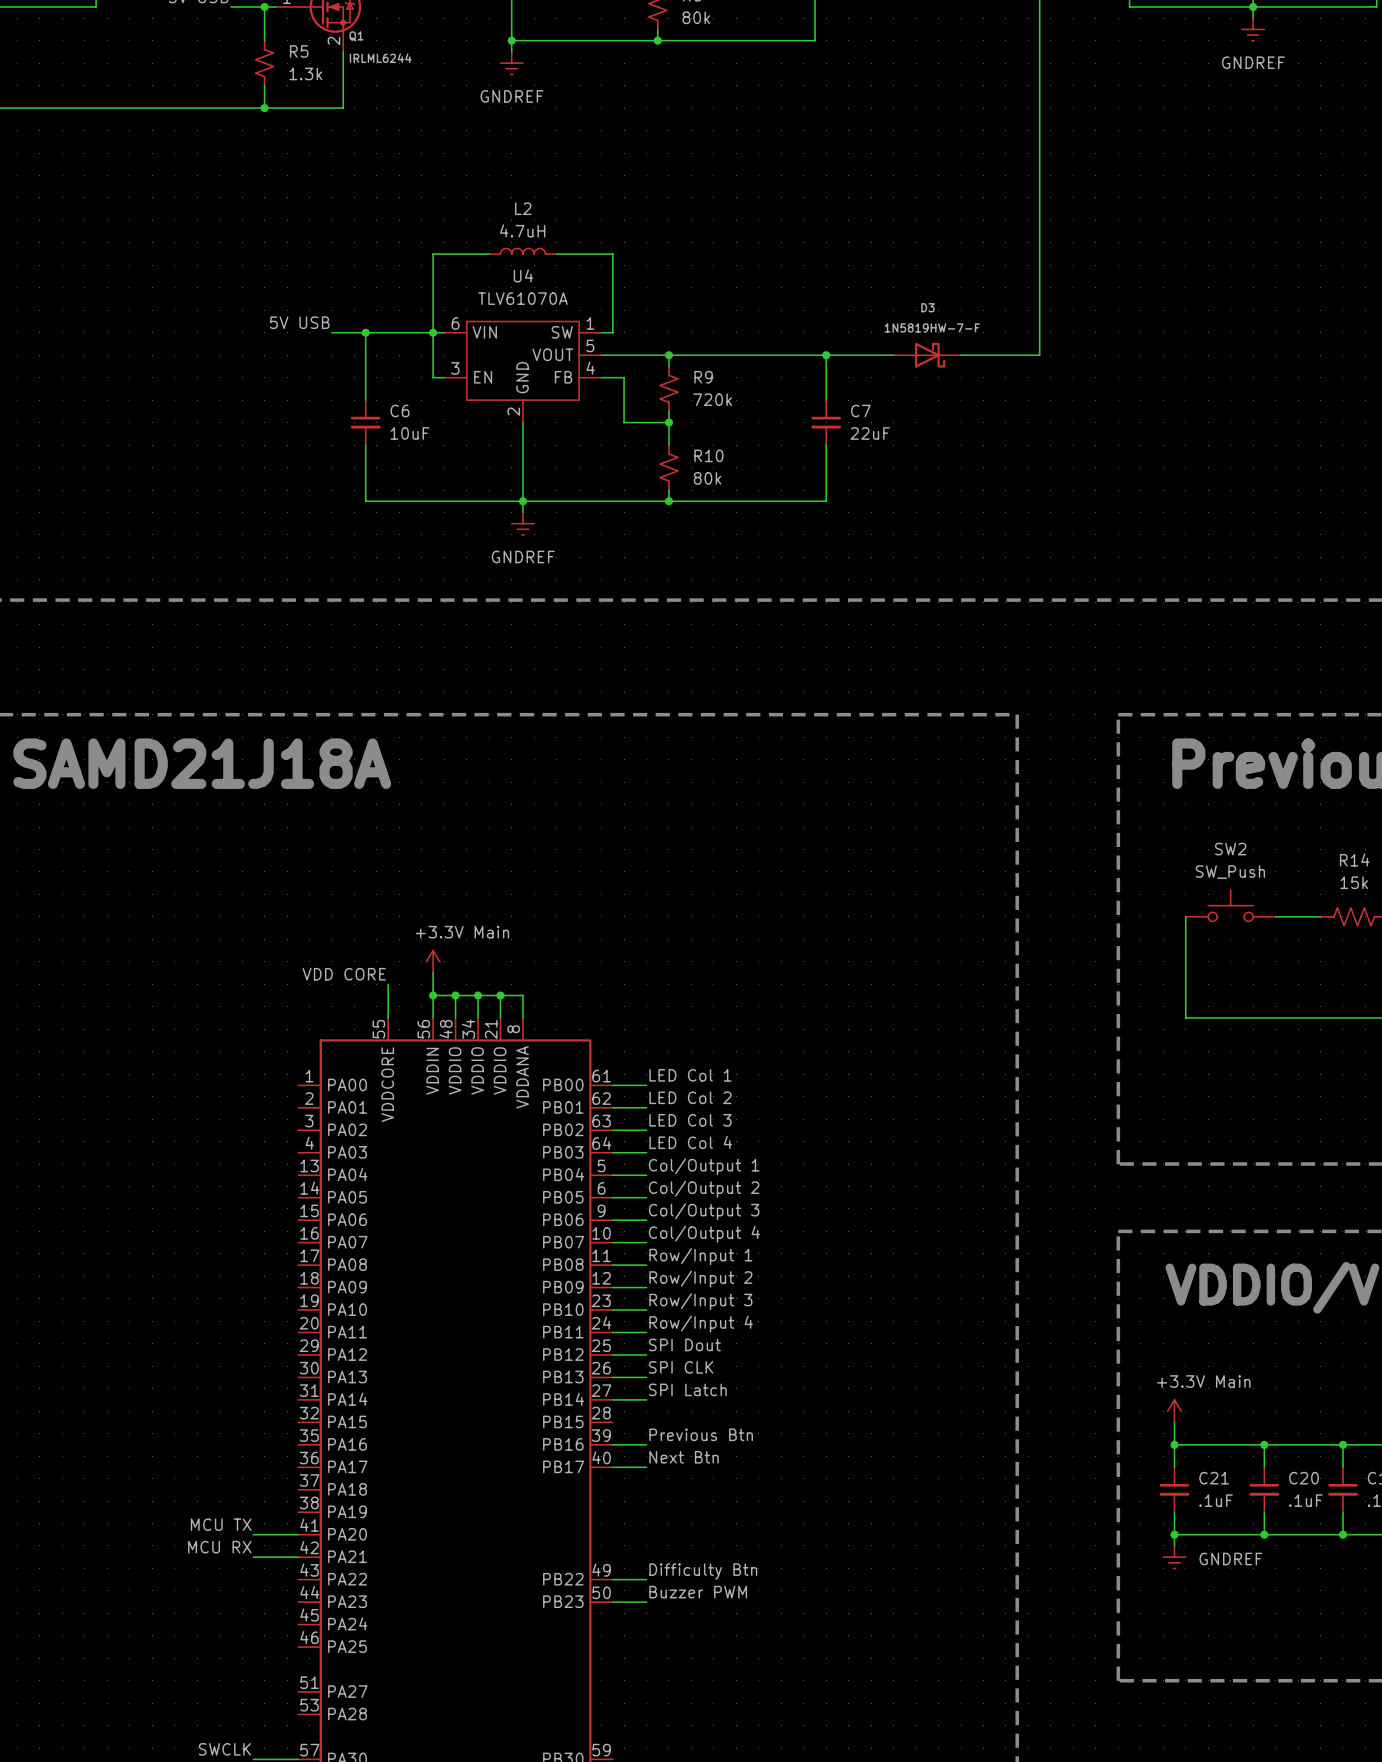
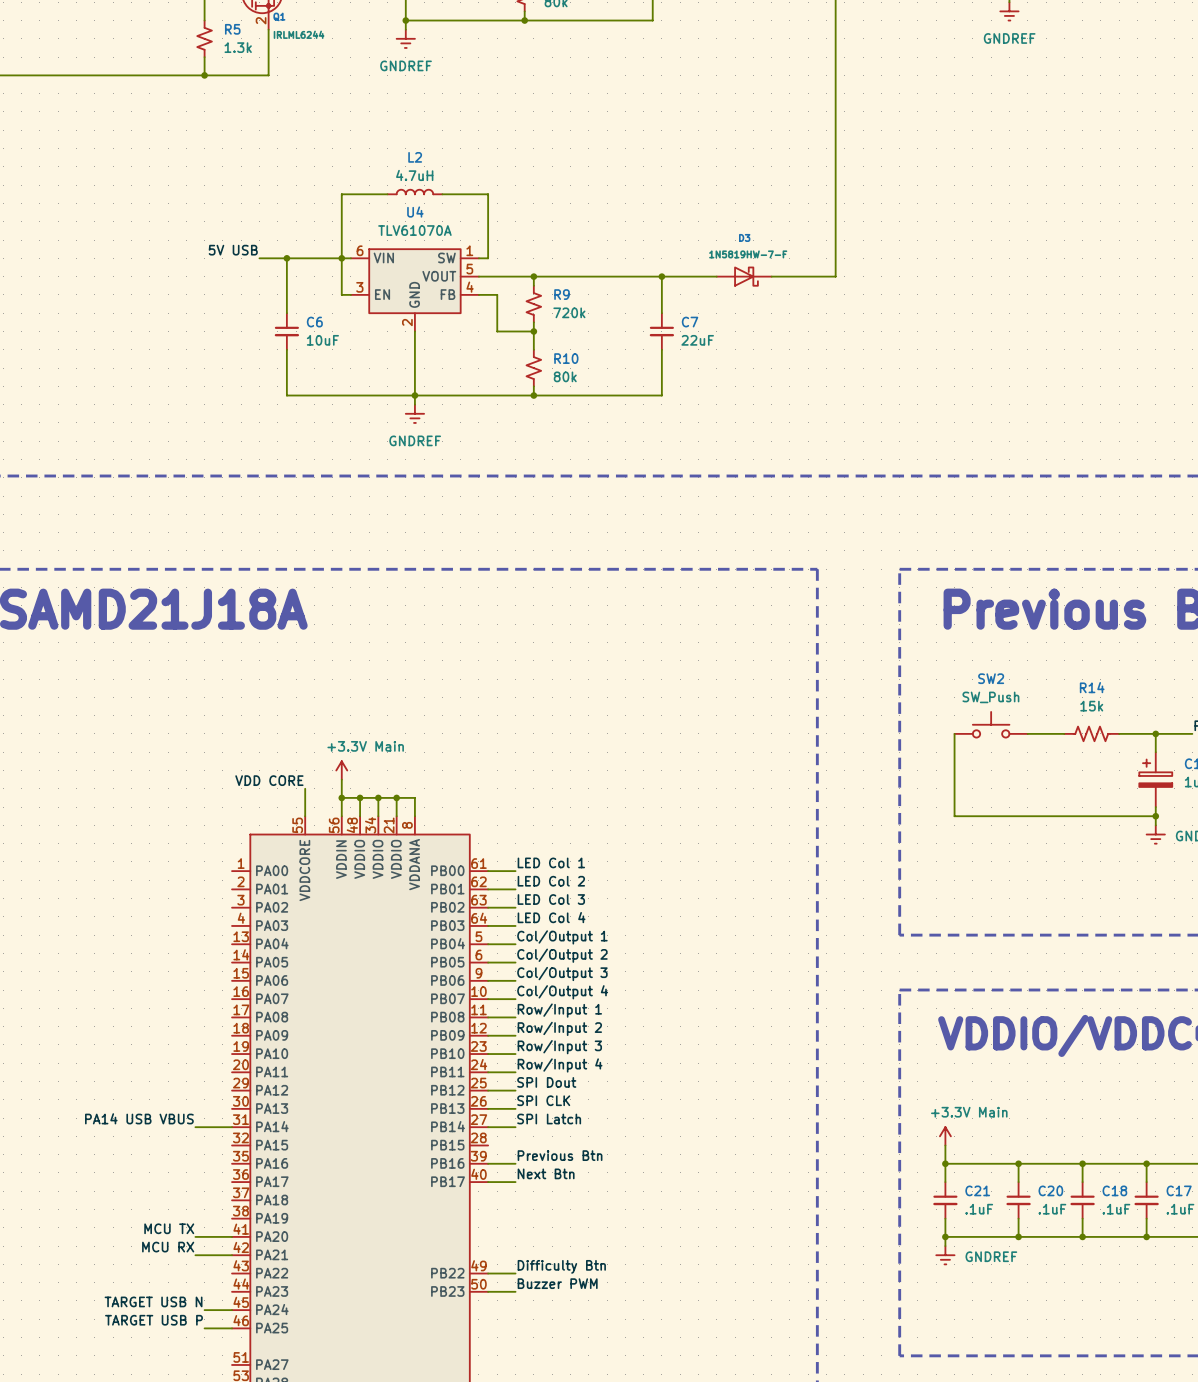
label: none -> PA14 USB VBUS (139, 1118)
wire: none -> (195, 1127) (232, 1127)
label: none -> TARGET USB N (153, 1301)
wire: none -> (204, 1310) (232, 1310)
label: none -> TARGET USB P (153, 1320)
wire: none -> (204, 1328) (232, 1328)

